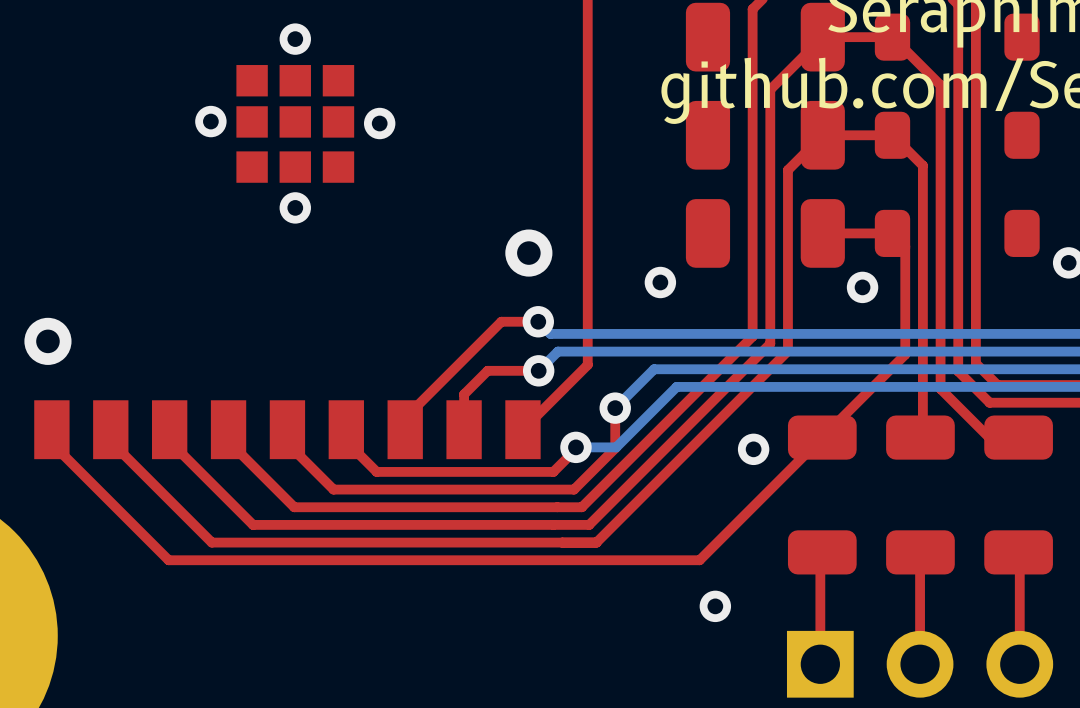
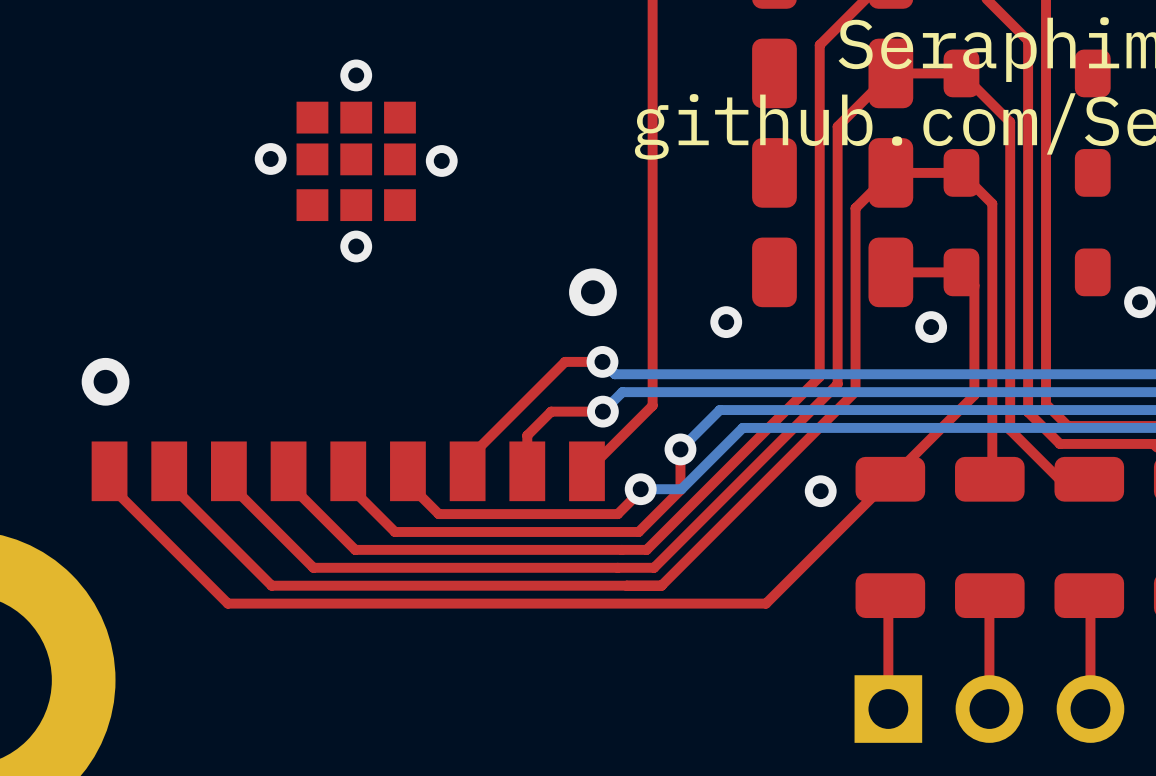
via: (715, 606) -> none

